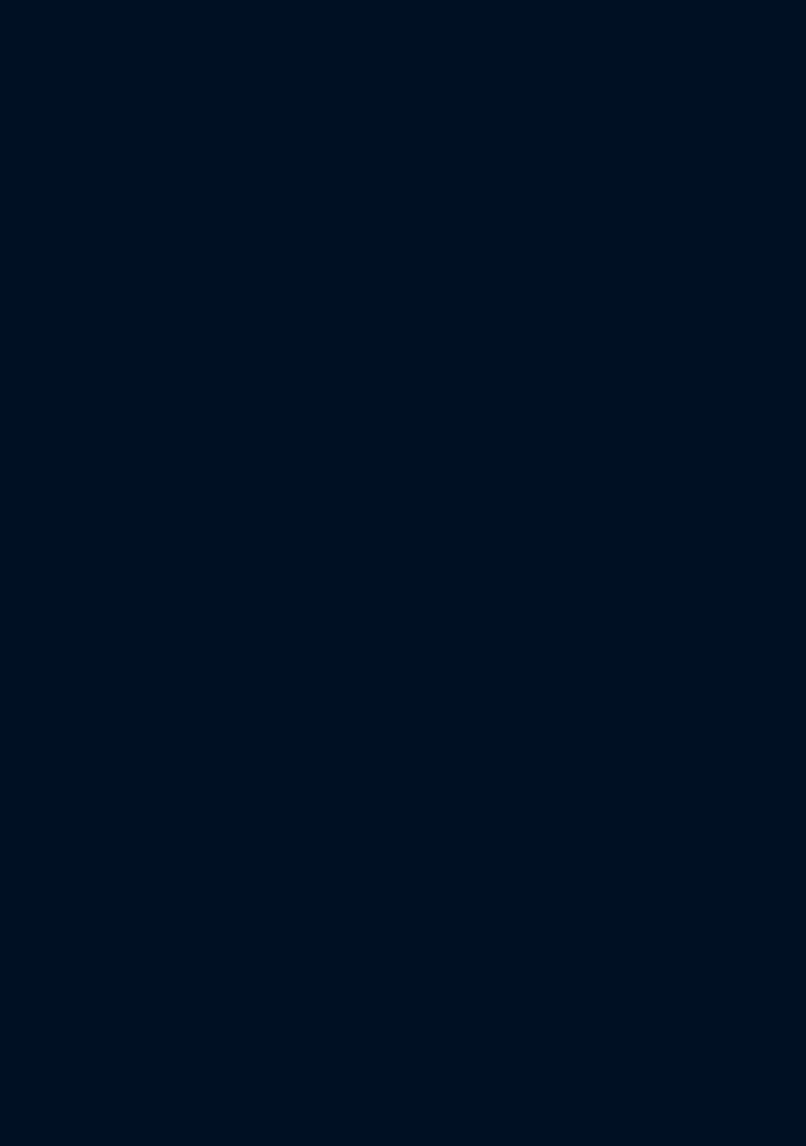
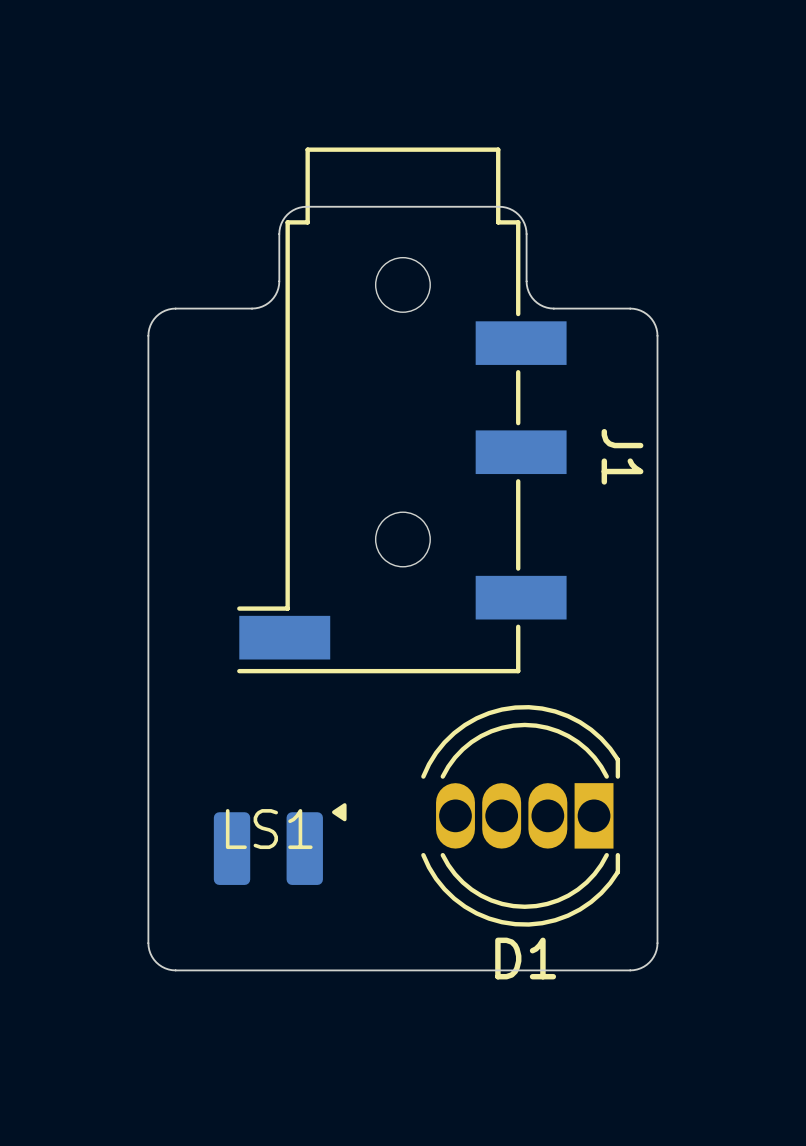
board edge: none -> (499, 206) (306, 206) (296, 208) (284, 217) (280, 226) (279, 284) (275, 294) (268, 302) (252, 308) (172, 308) (159, 314) (150, 325) (148, 335) (148, 943) (154, 959) (165, 968) (175, 970) (630, 970) (643, 966) (655, 953) (657, 943) (656, 328) (649, 316) (637, 309) (550, 308) (537, 302) (530, 294) (526, 284) (526, 234) (524, 223) (515, 212) (499, 206)
J1: none -> (401, 410)
D1: none -> (520, 815)
LS1: none -> (280, 844)

